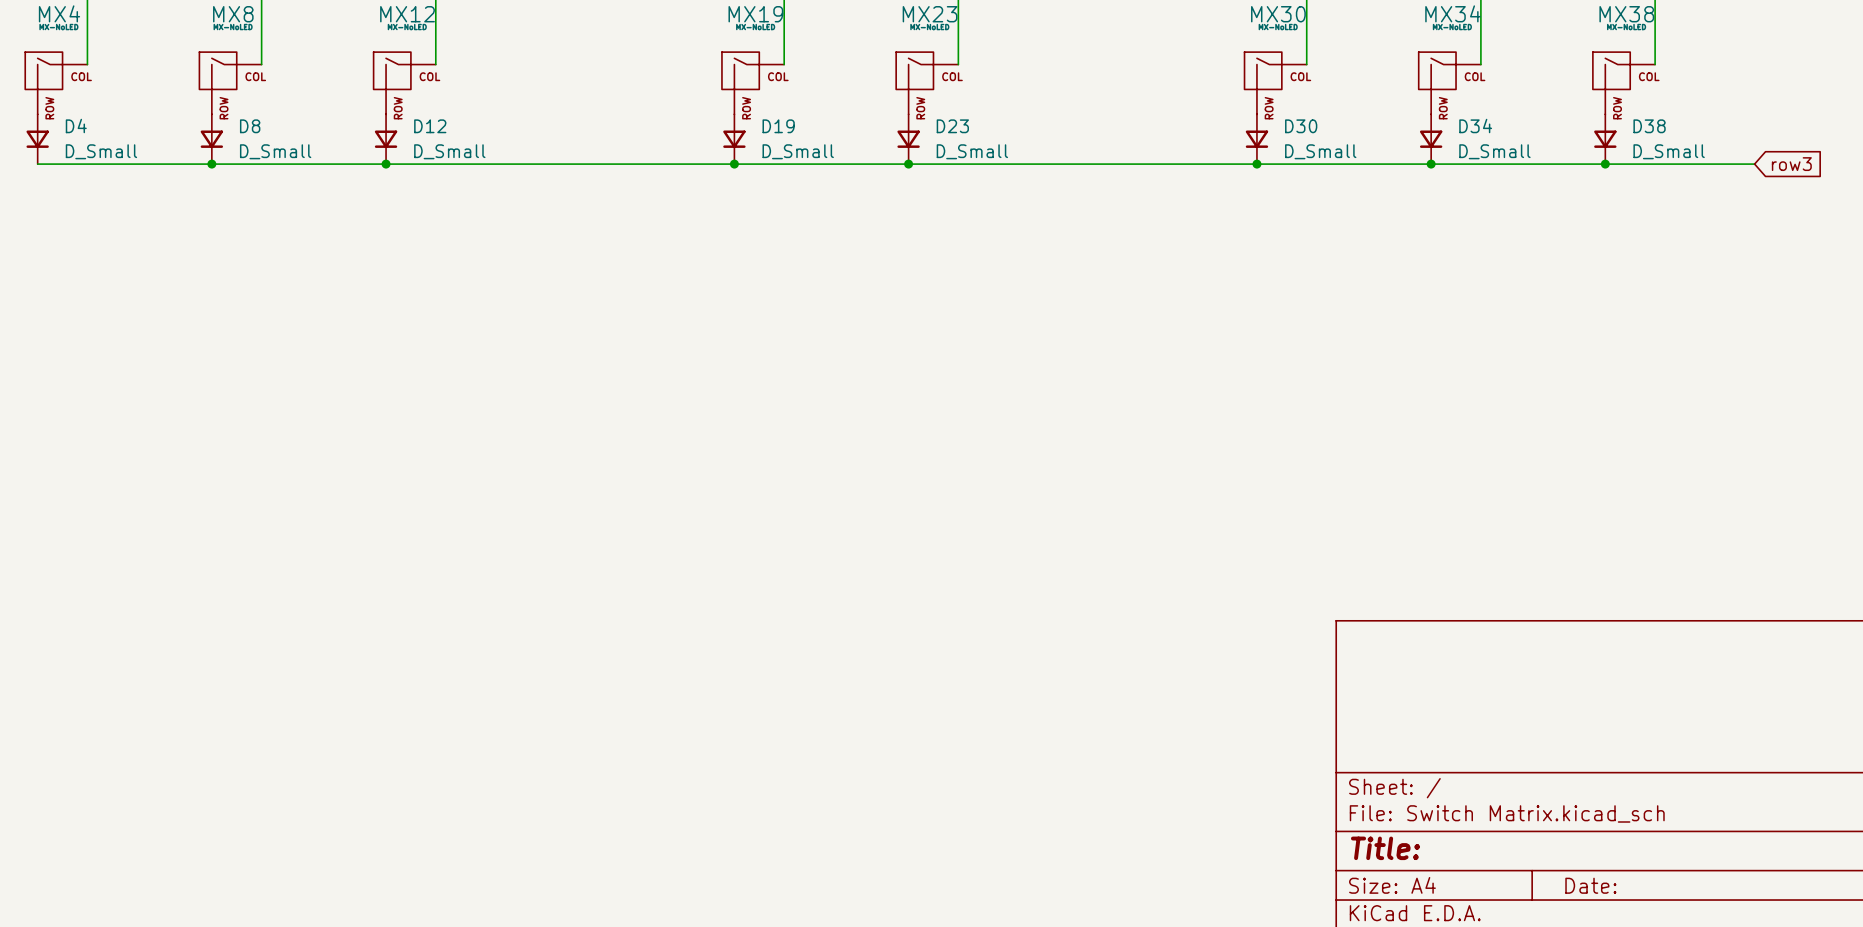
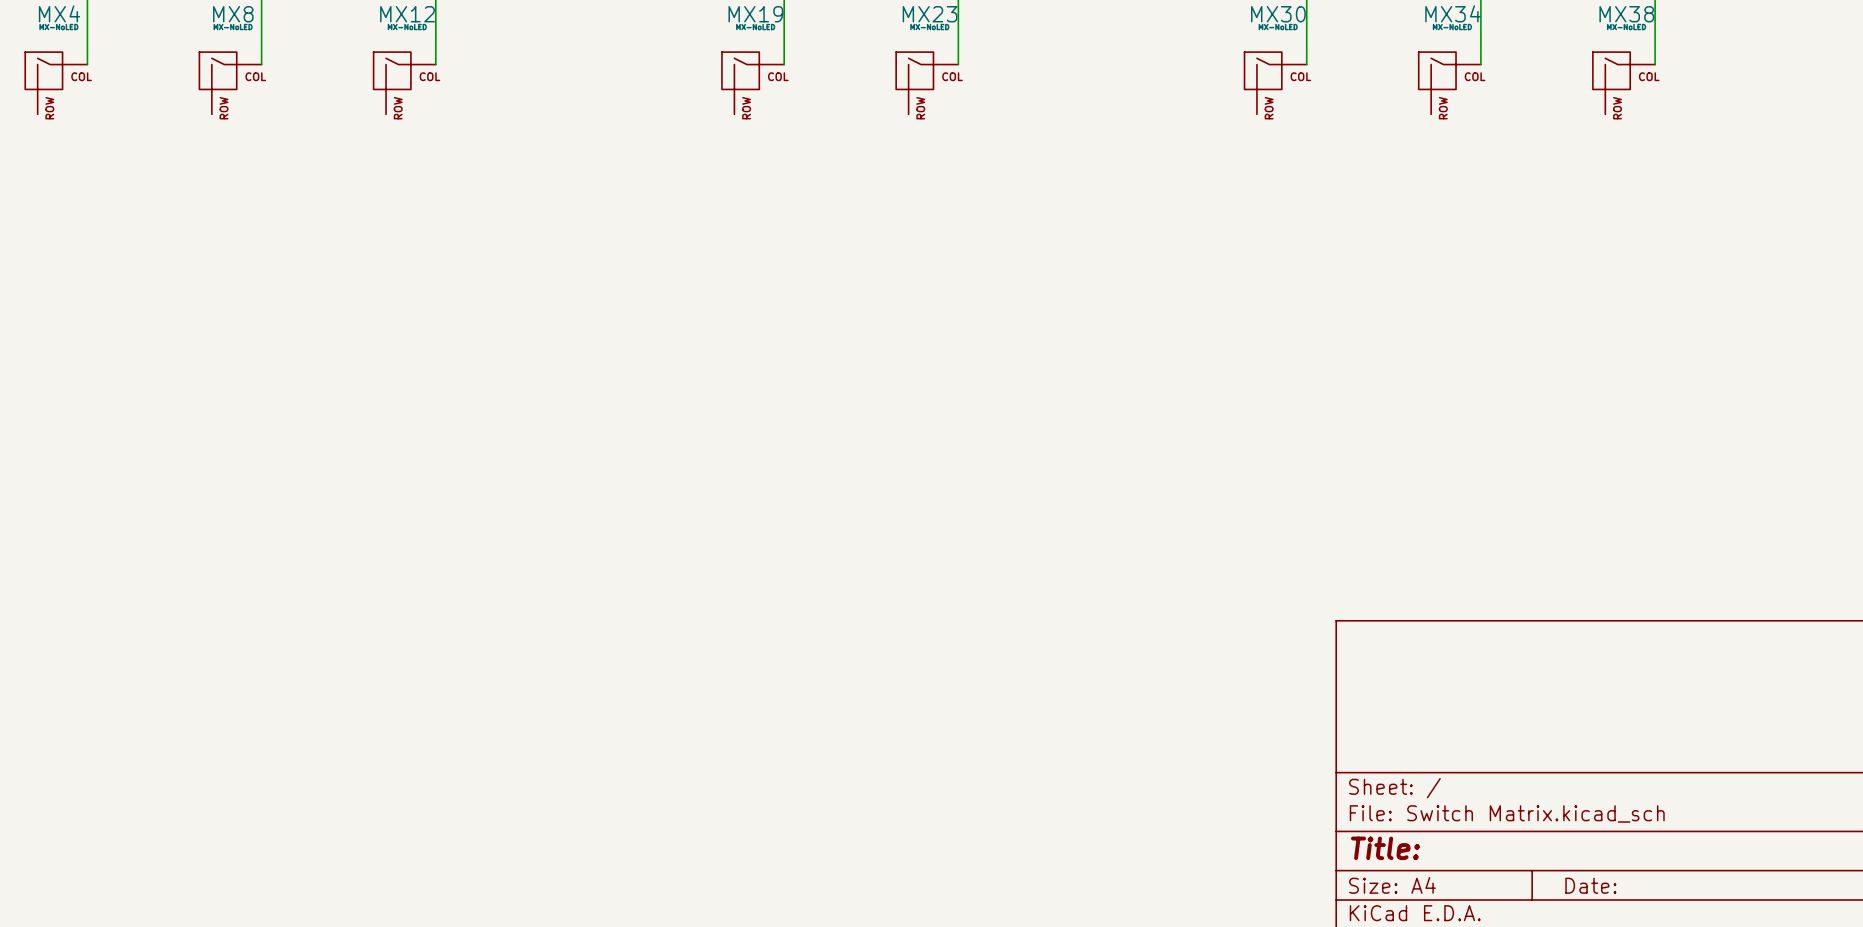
D4: D_Small (37, 139) -> none
D8: D_Small (211, 139) -> none
D12: D_Small (386, 139) -> none
D19: D_Small (734, 139) -> none
D23: D_Small (908, 139) -> none
D30: D_Small (1256, 139) -> none
D34: D_Small (1431, 139) -> none
D38: D_Small (1605, 139) -> none
wire: (37, 164) (1754, 164) -> none
junction: (211, 164) -> none
junction: (386, 164) -> none
junction: (734, 164) -> none
junction: (908, 164) -> none
junction: (1256, 164) -> none
junction: (1431, 164) -> none
junction: (1605, 164) -> none
global label: row3 (1791, 164) -> none

